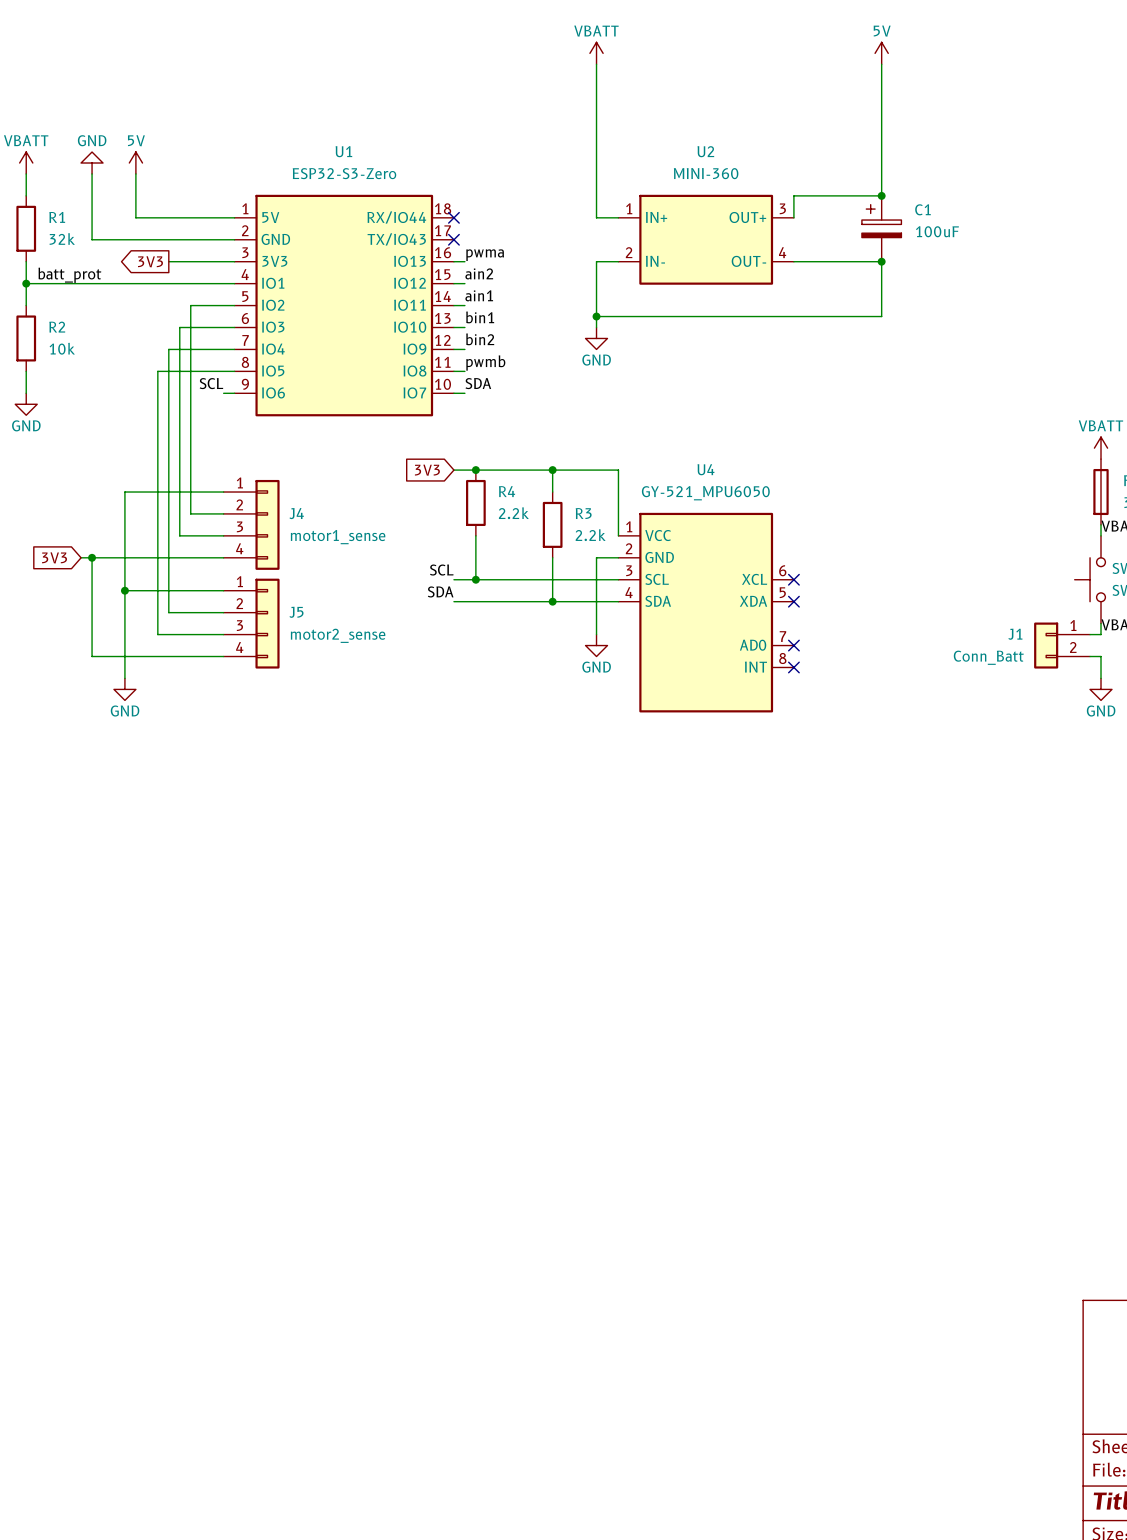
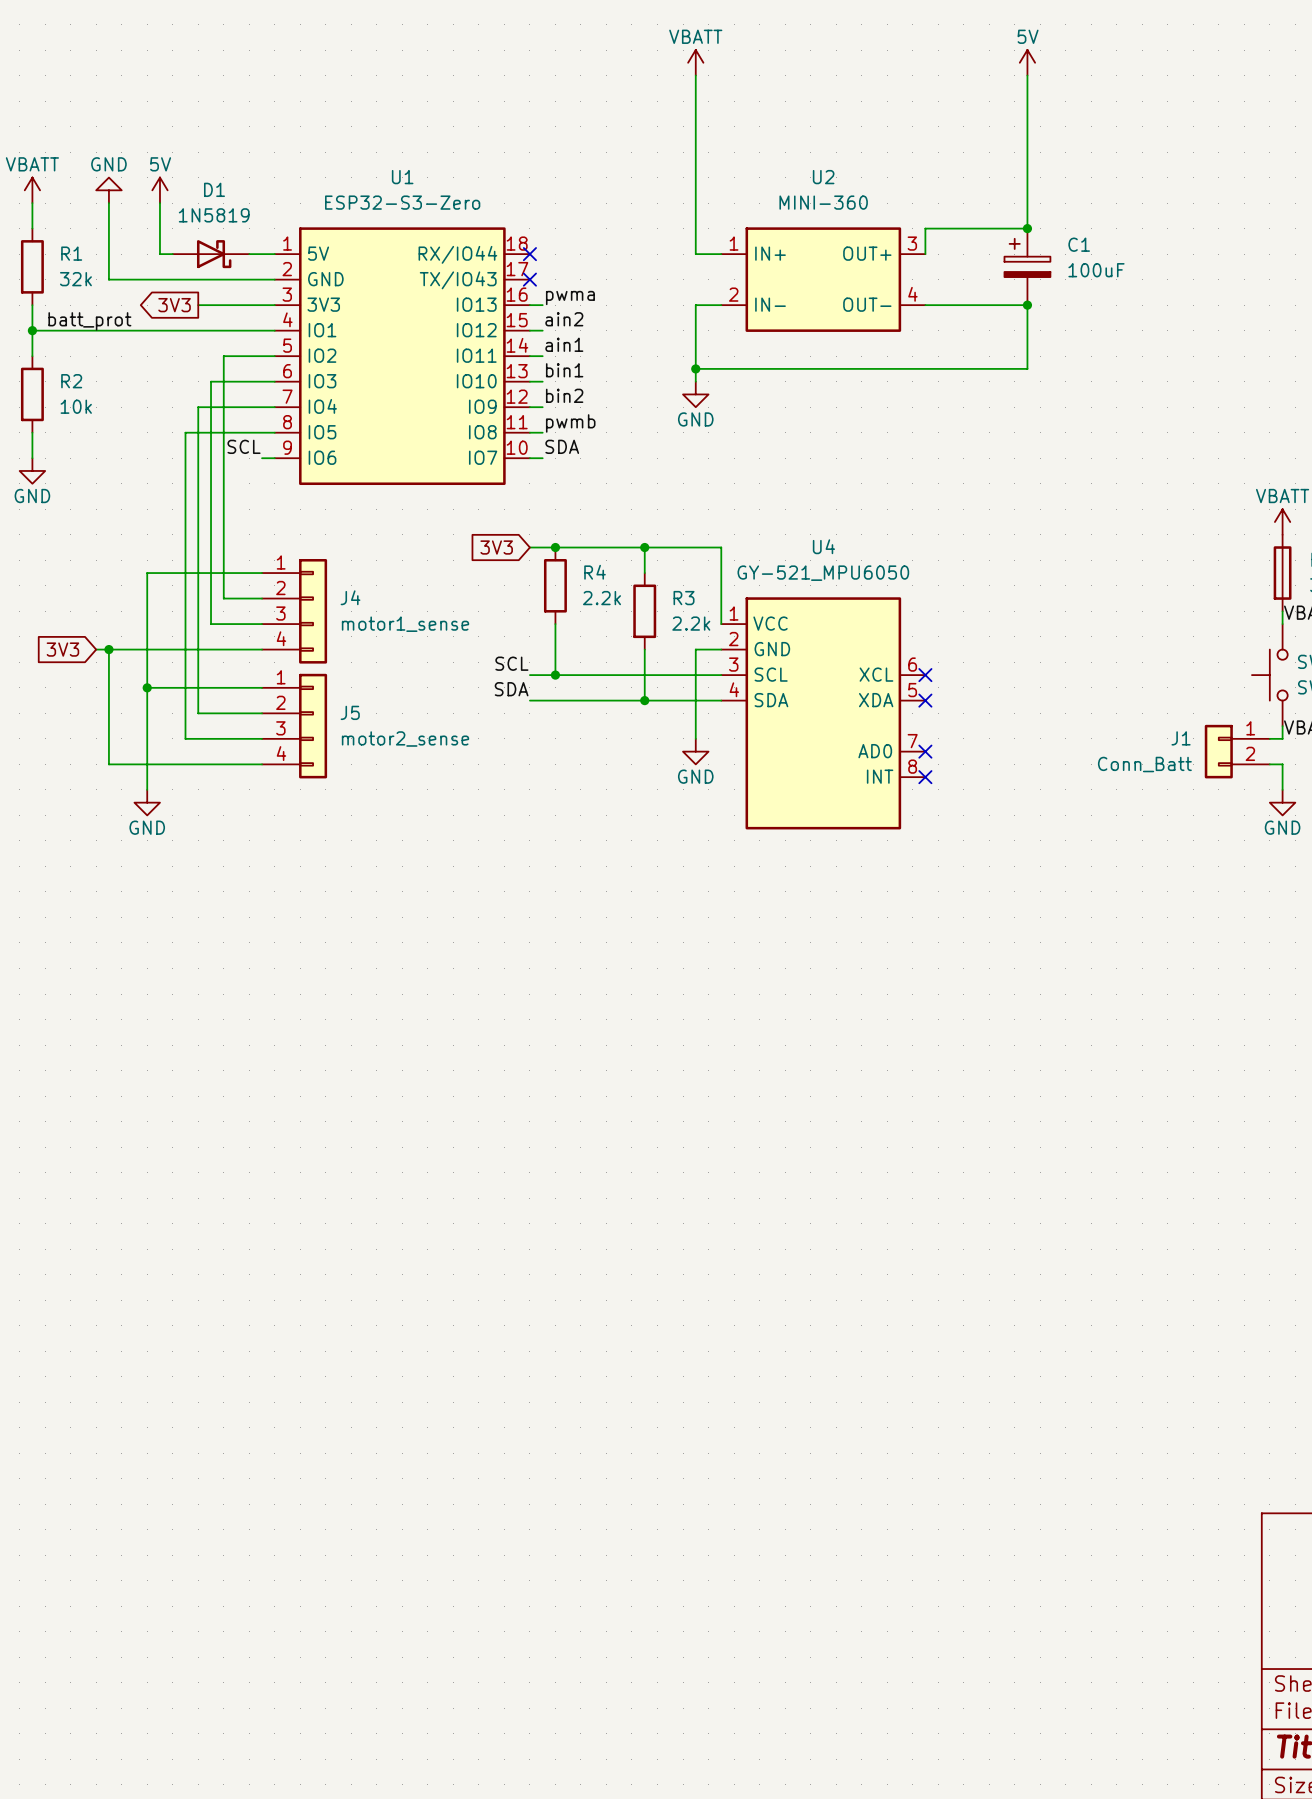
D1: none -> 1N5819 (211, 254)

